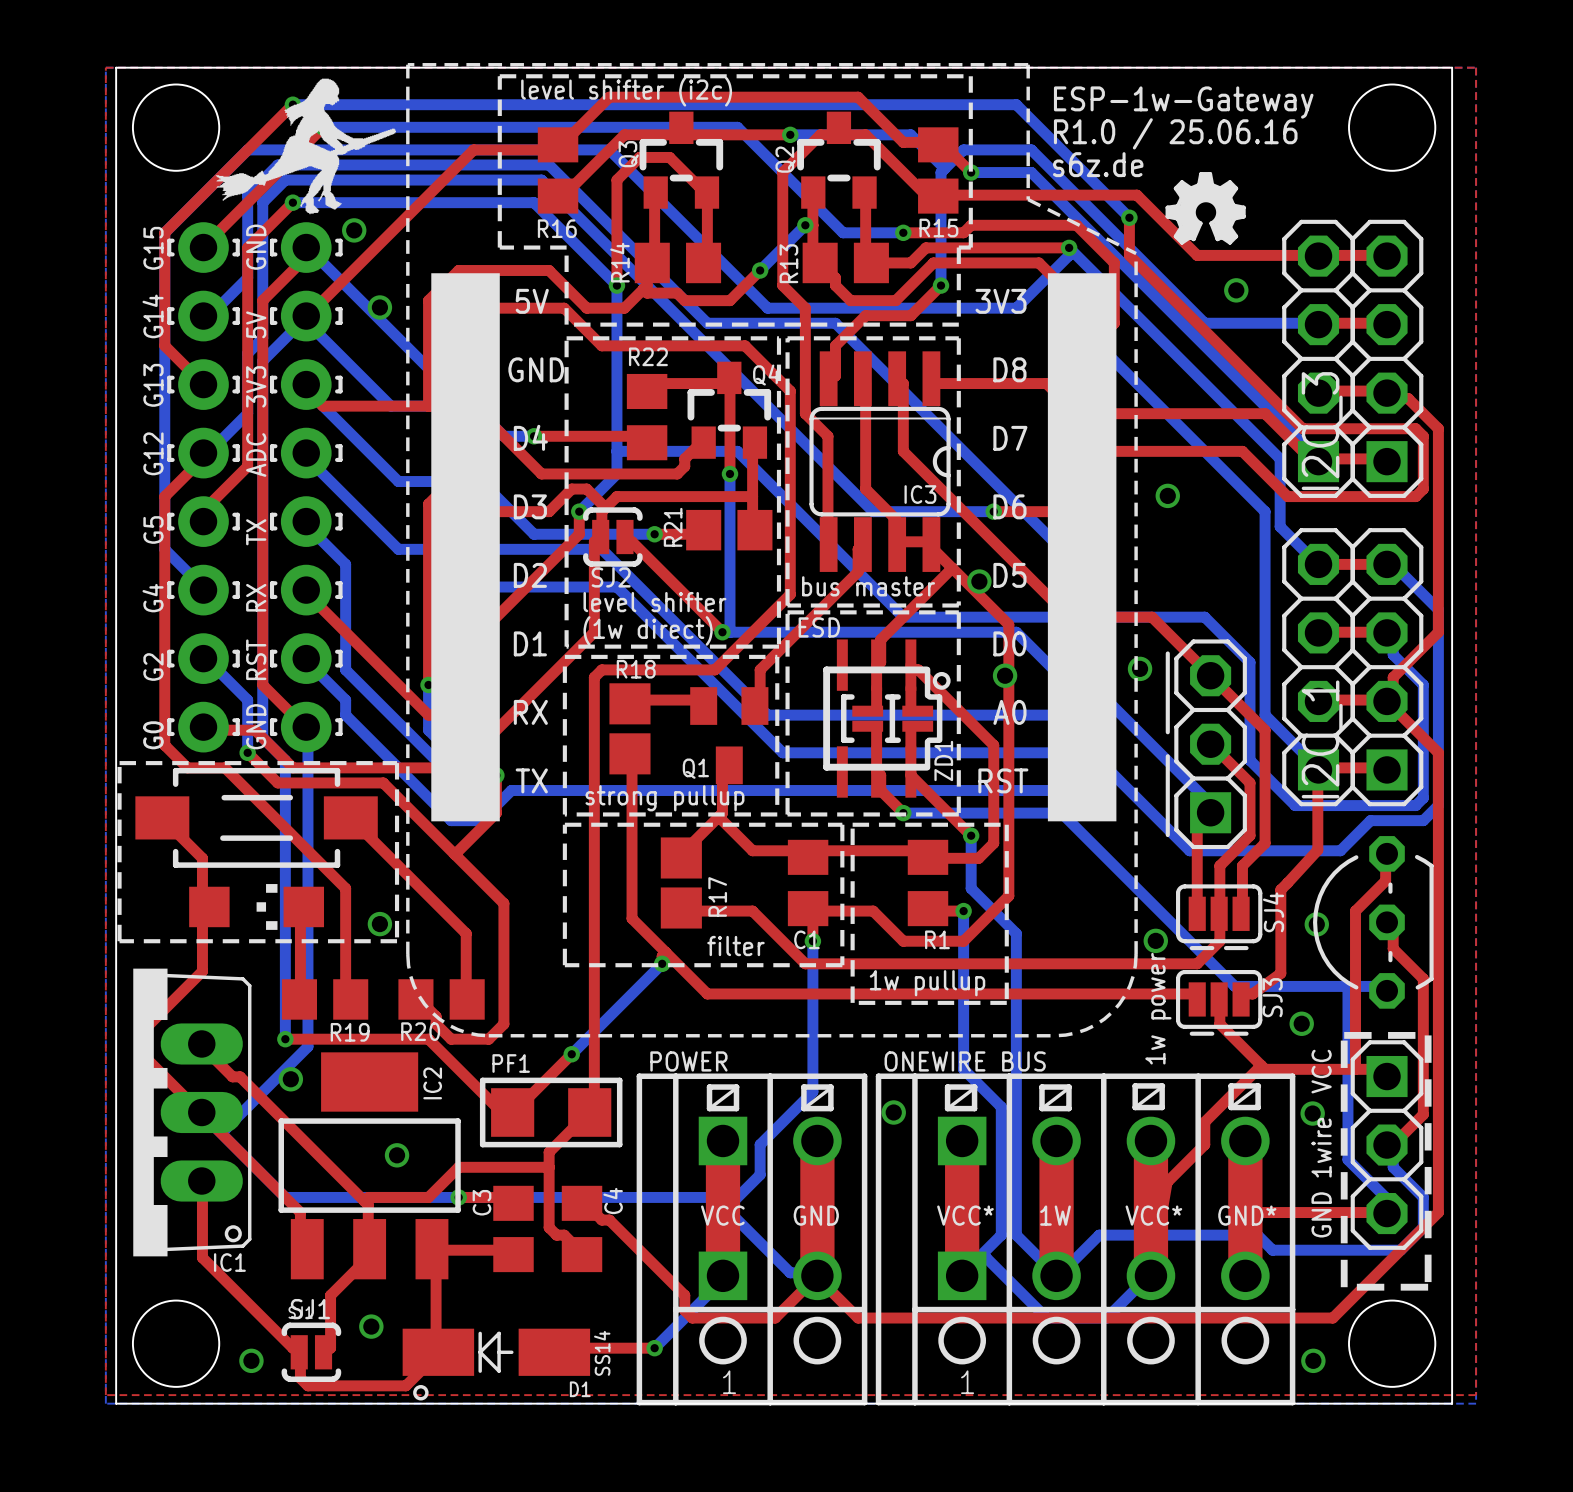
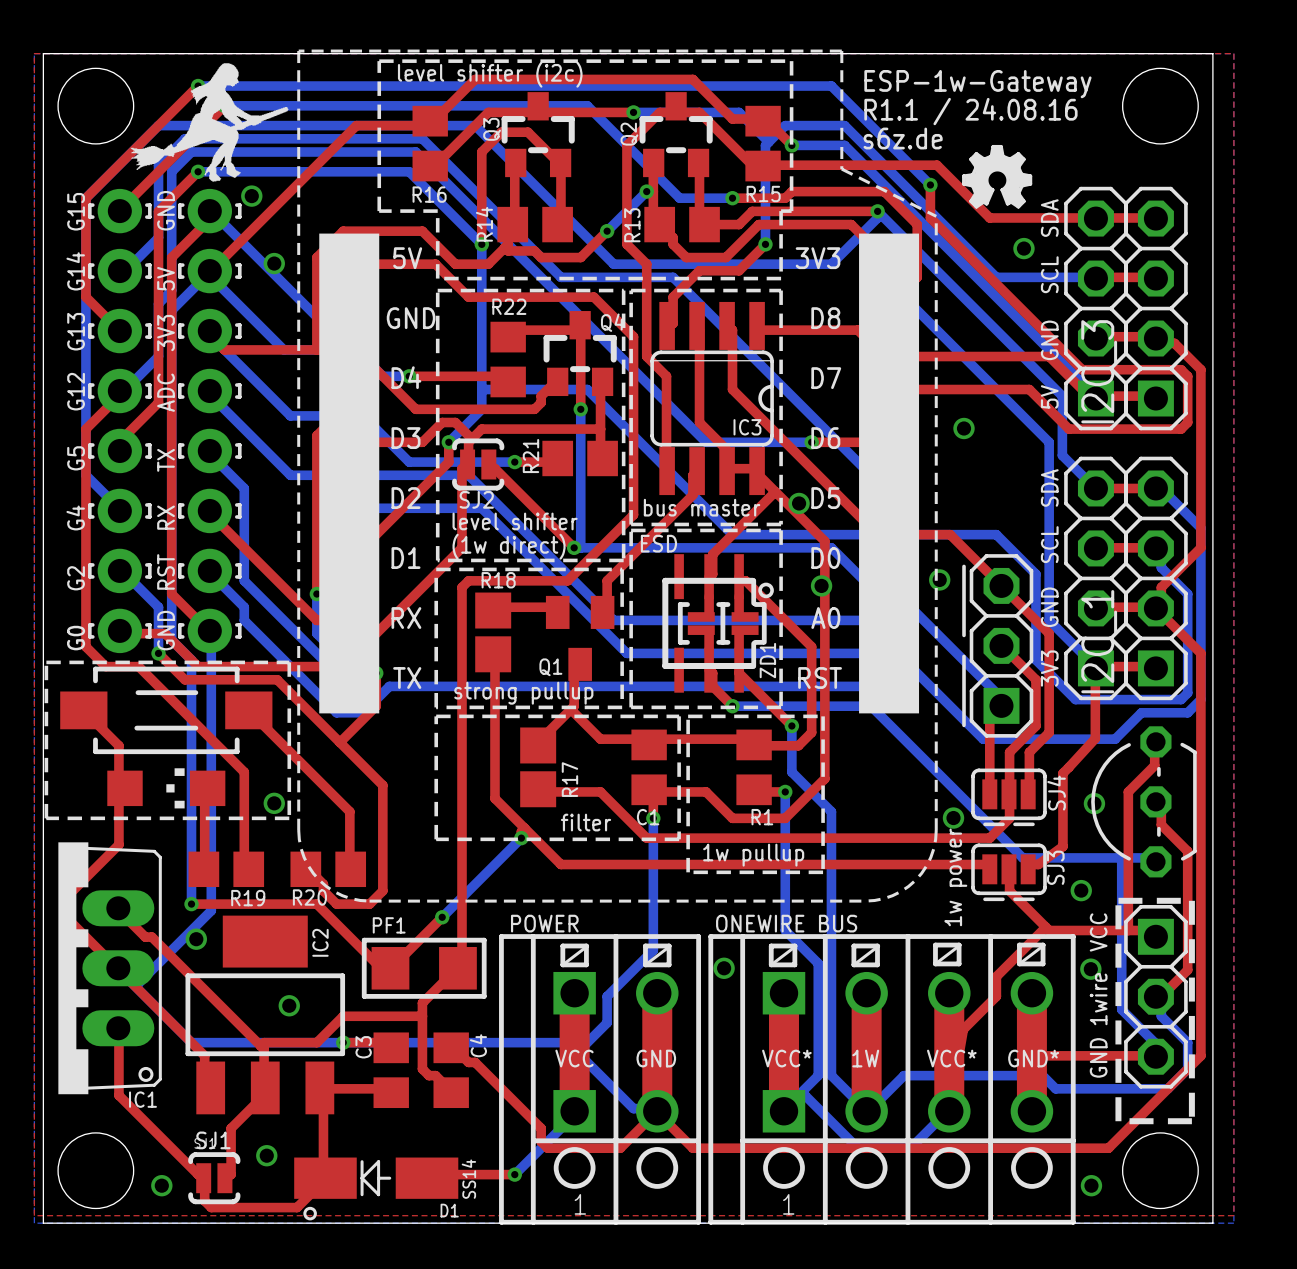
text: R1.0 / 25.06.16 (1175, 133) -> R1.1 / 24.08.16 (970, 111)
text: none -> SDA (1049, 218)
text: none -> SCL (1049, 274)
text: none -> GND (1049, 340)
text: none -> 5V (1049, 396)
text: none -> SDA (1049, 487)
text: none -> SCL (1049, 544)
text: none -> GND (1049, 607)
text: none -> 3V3 (1049, 668)

